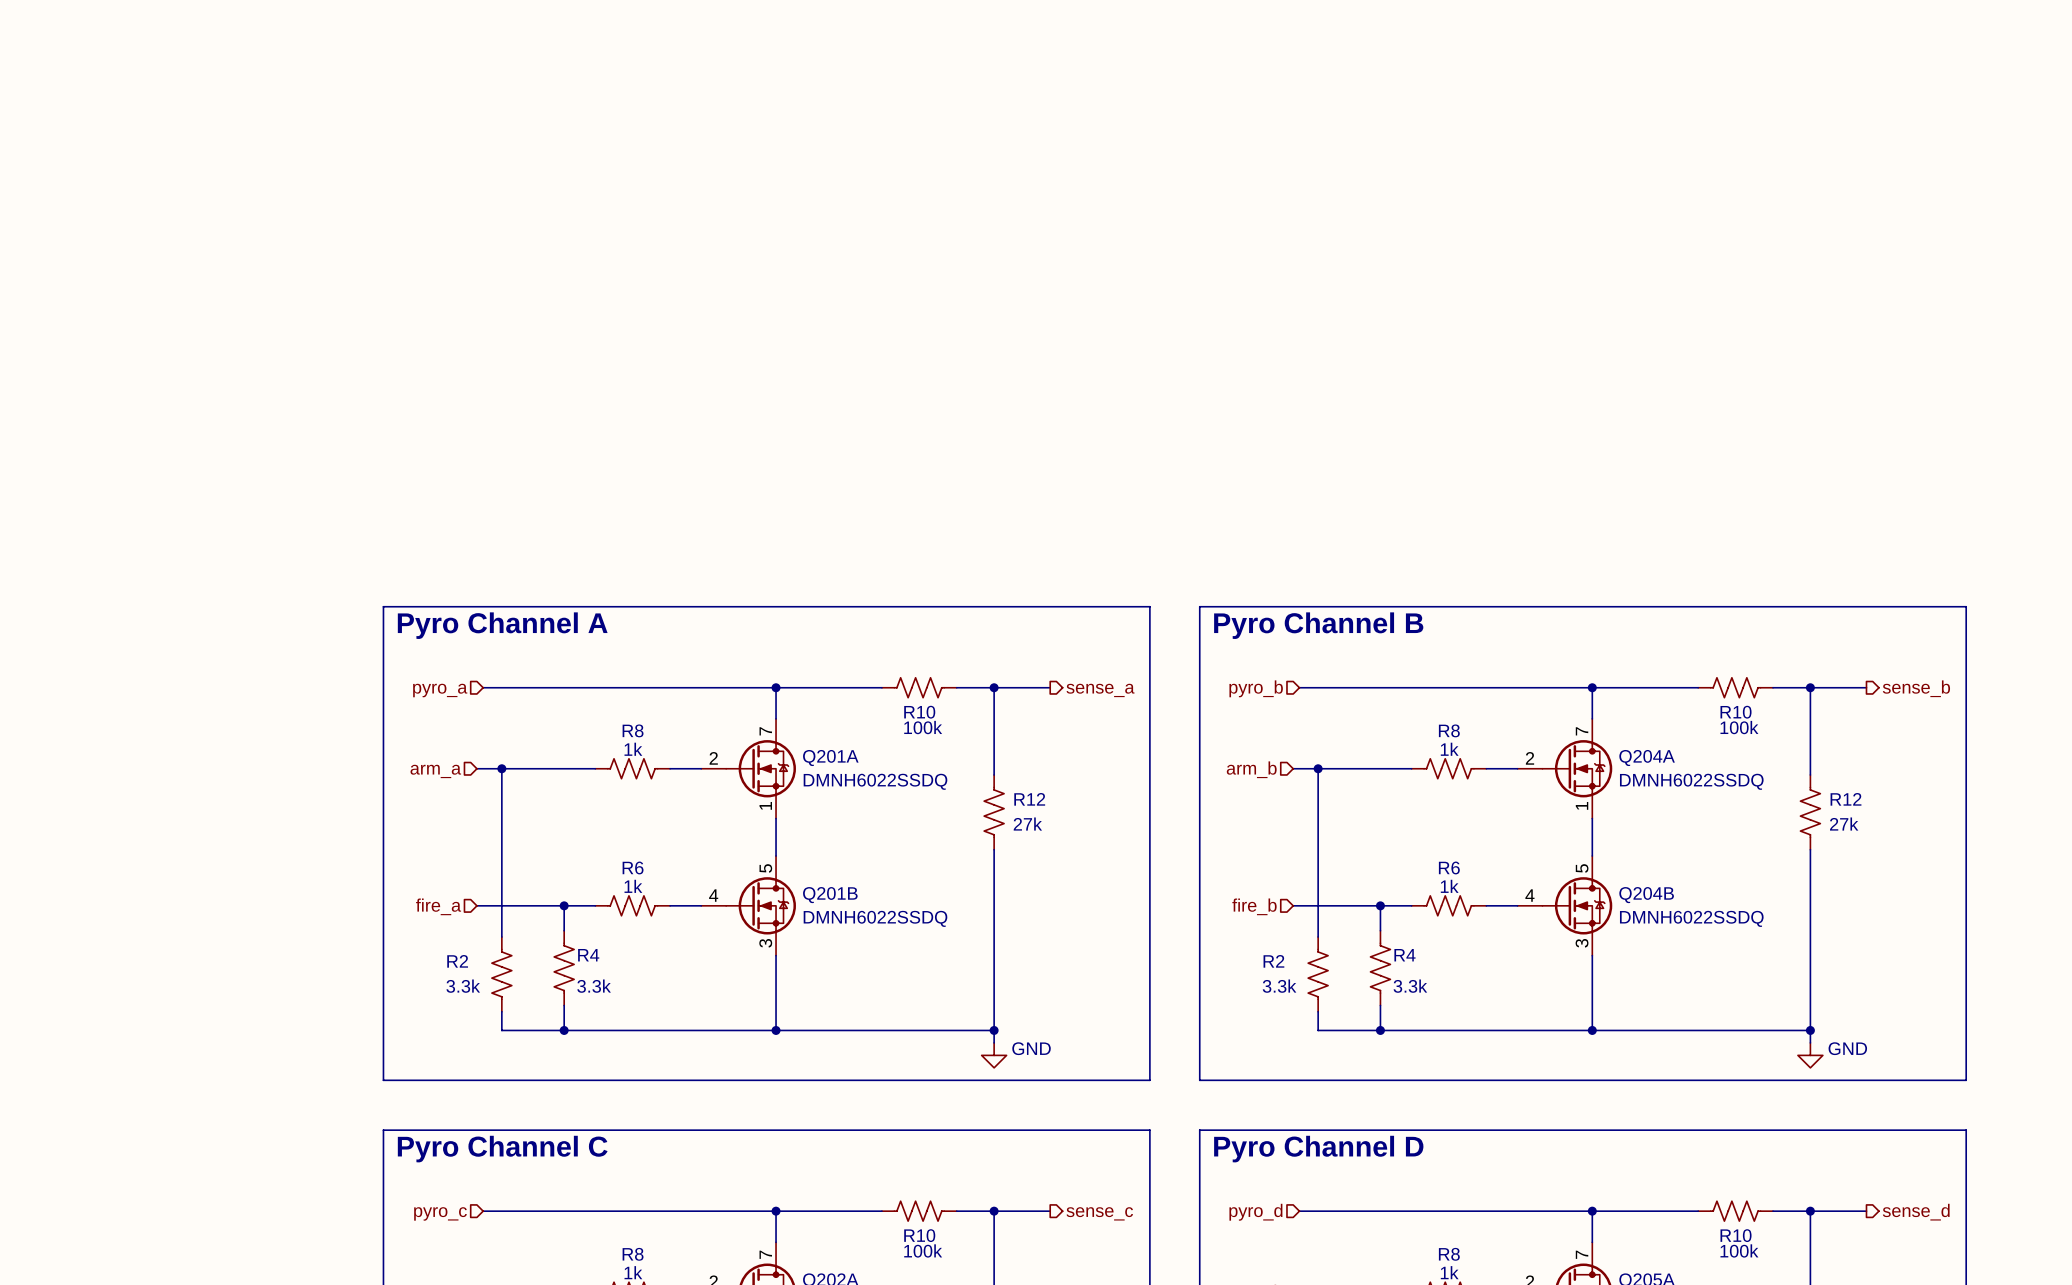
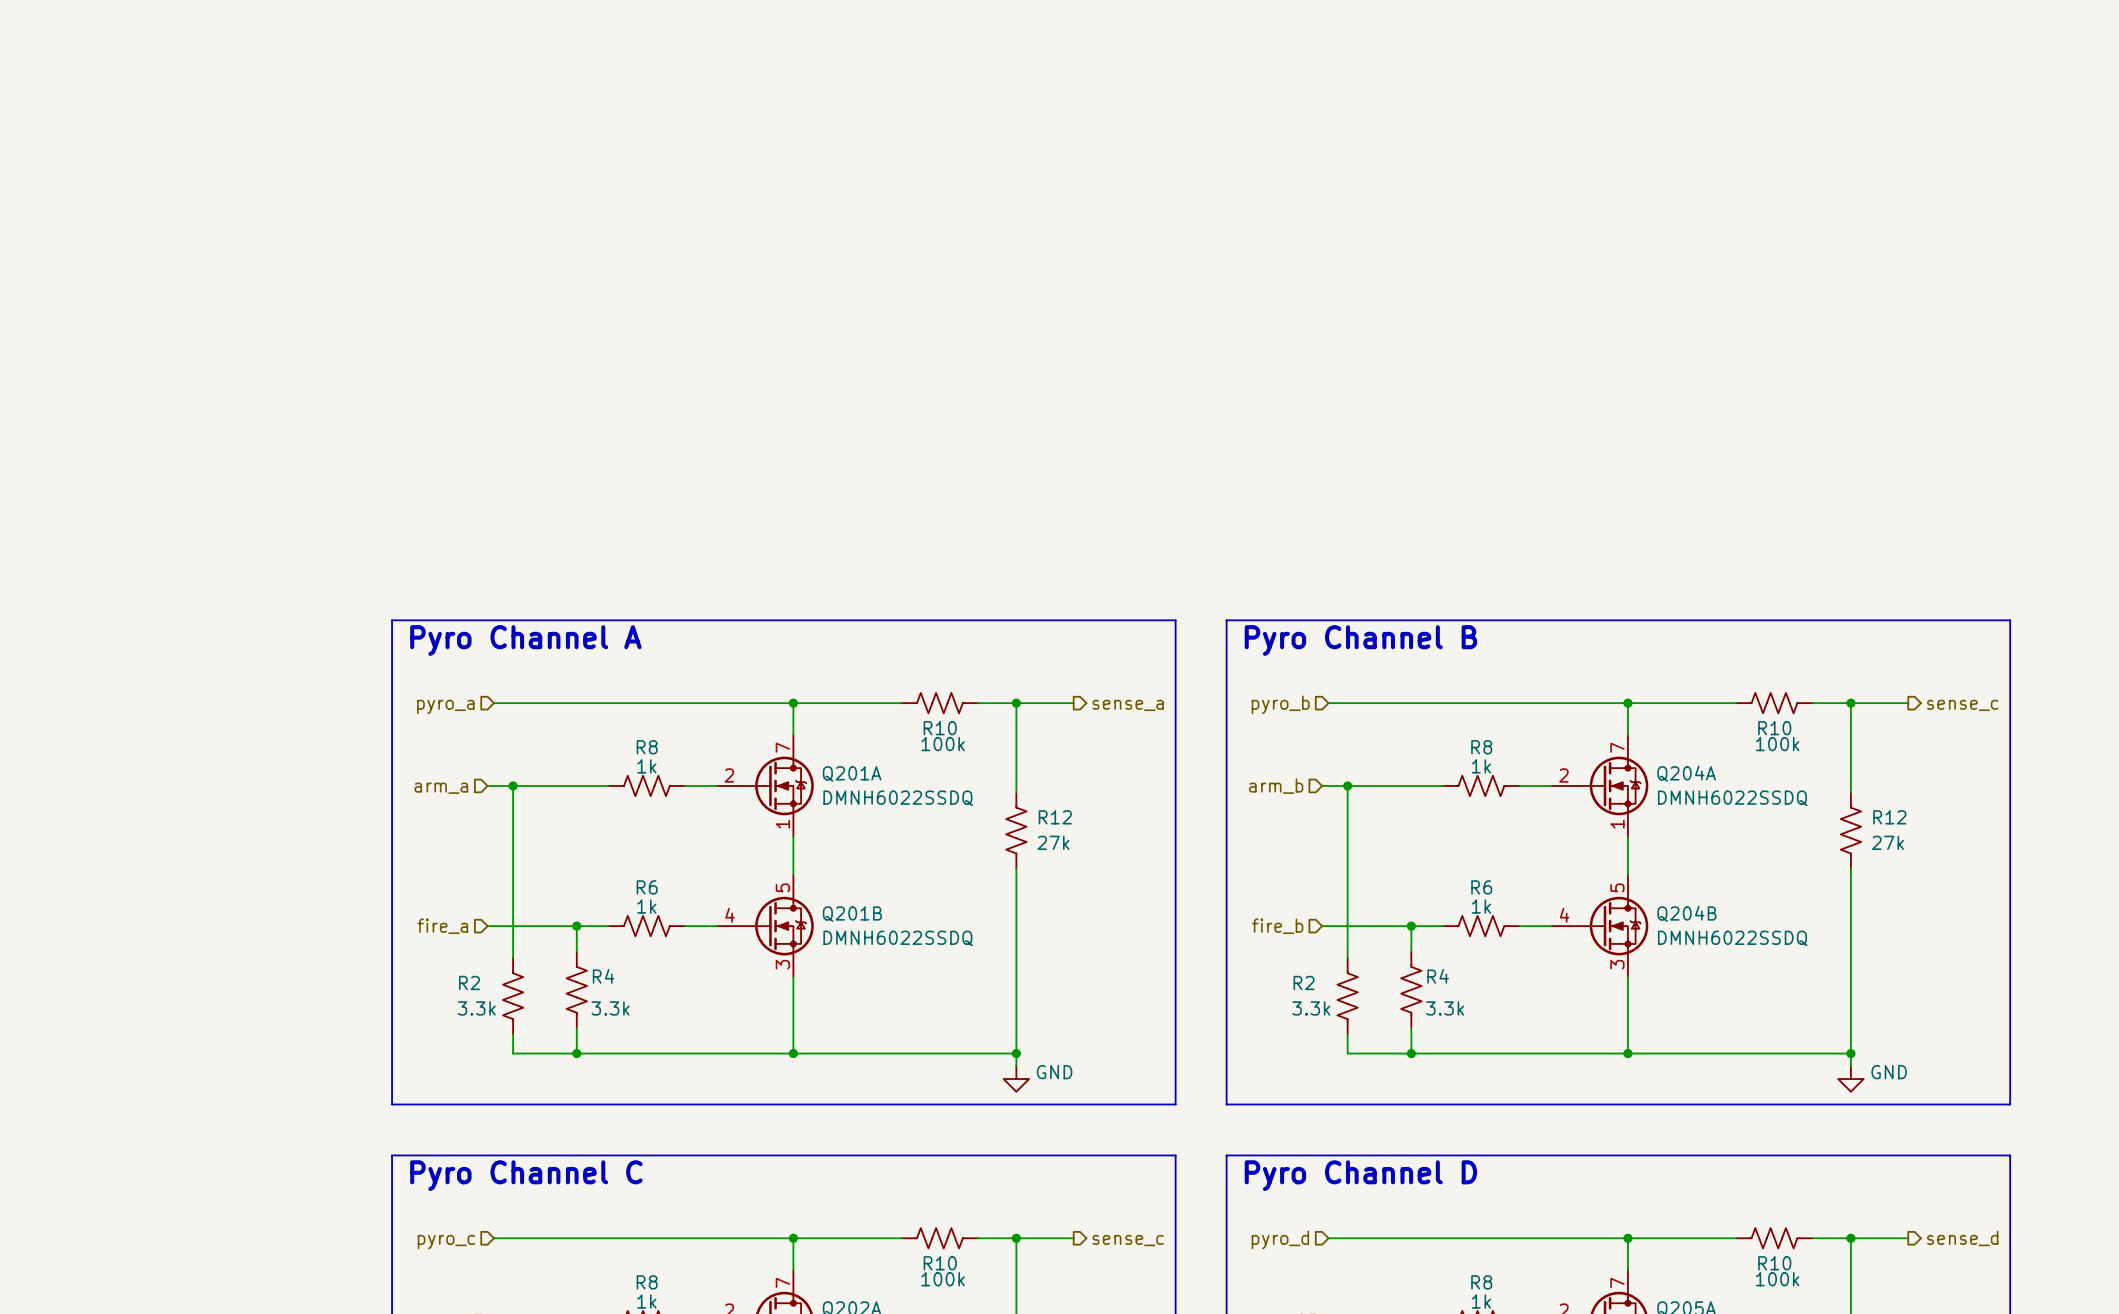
hierarchical label: sense_b (1916, 688) -> sense_c (1962, 705)

